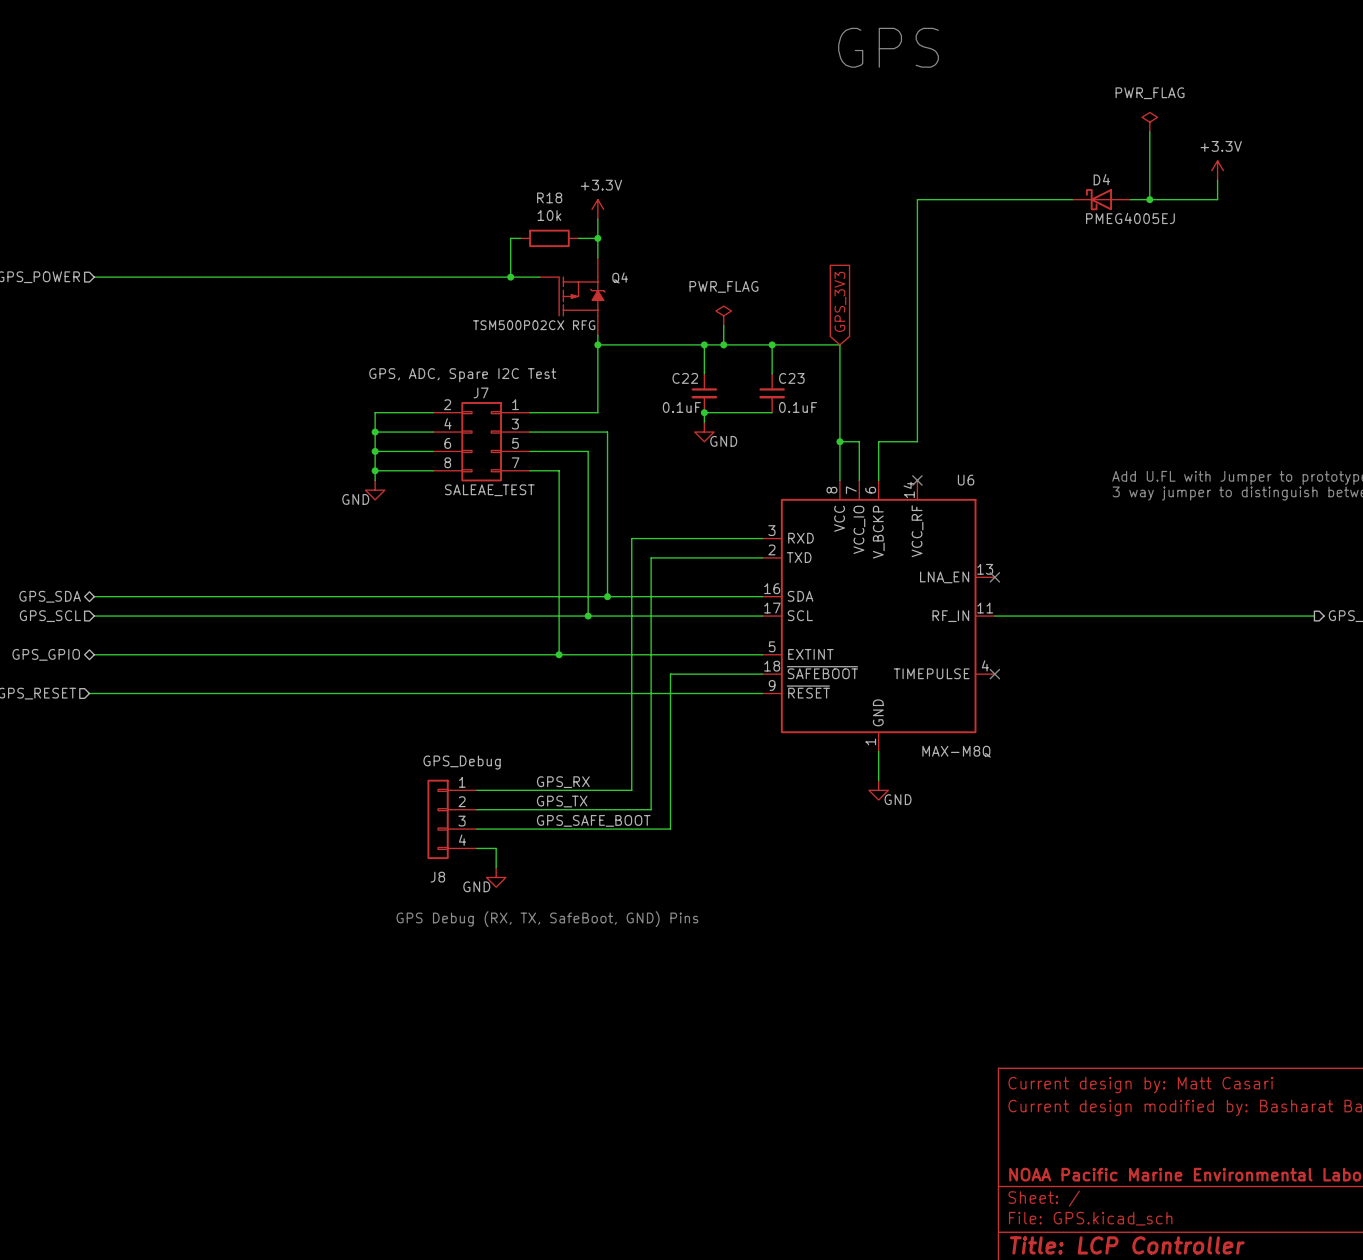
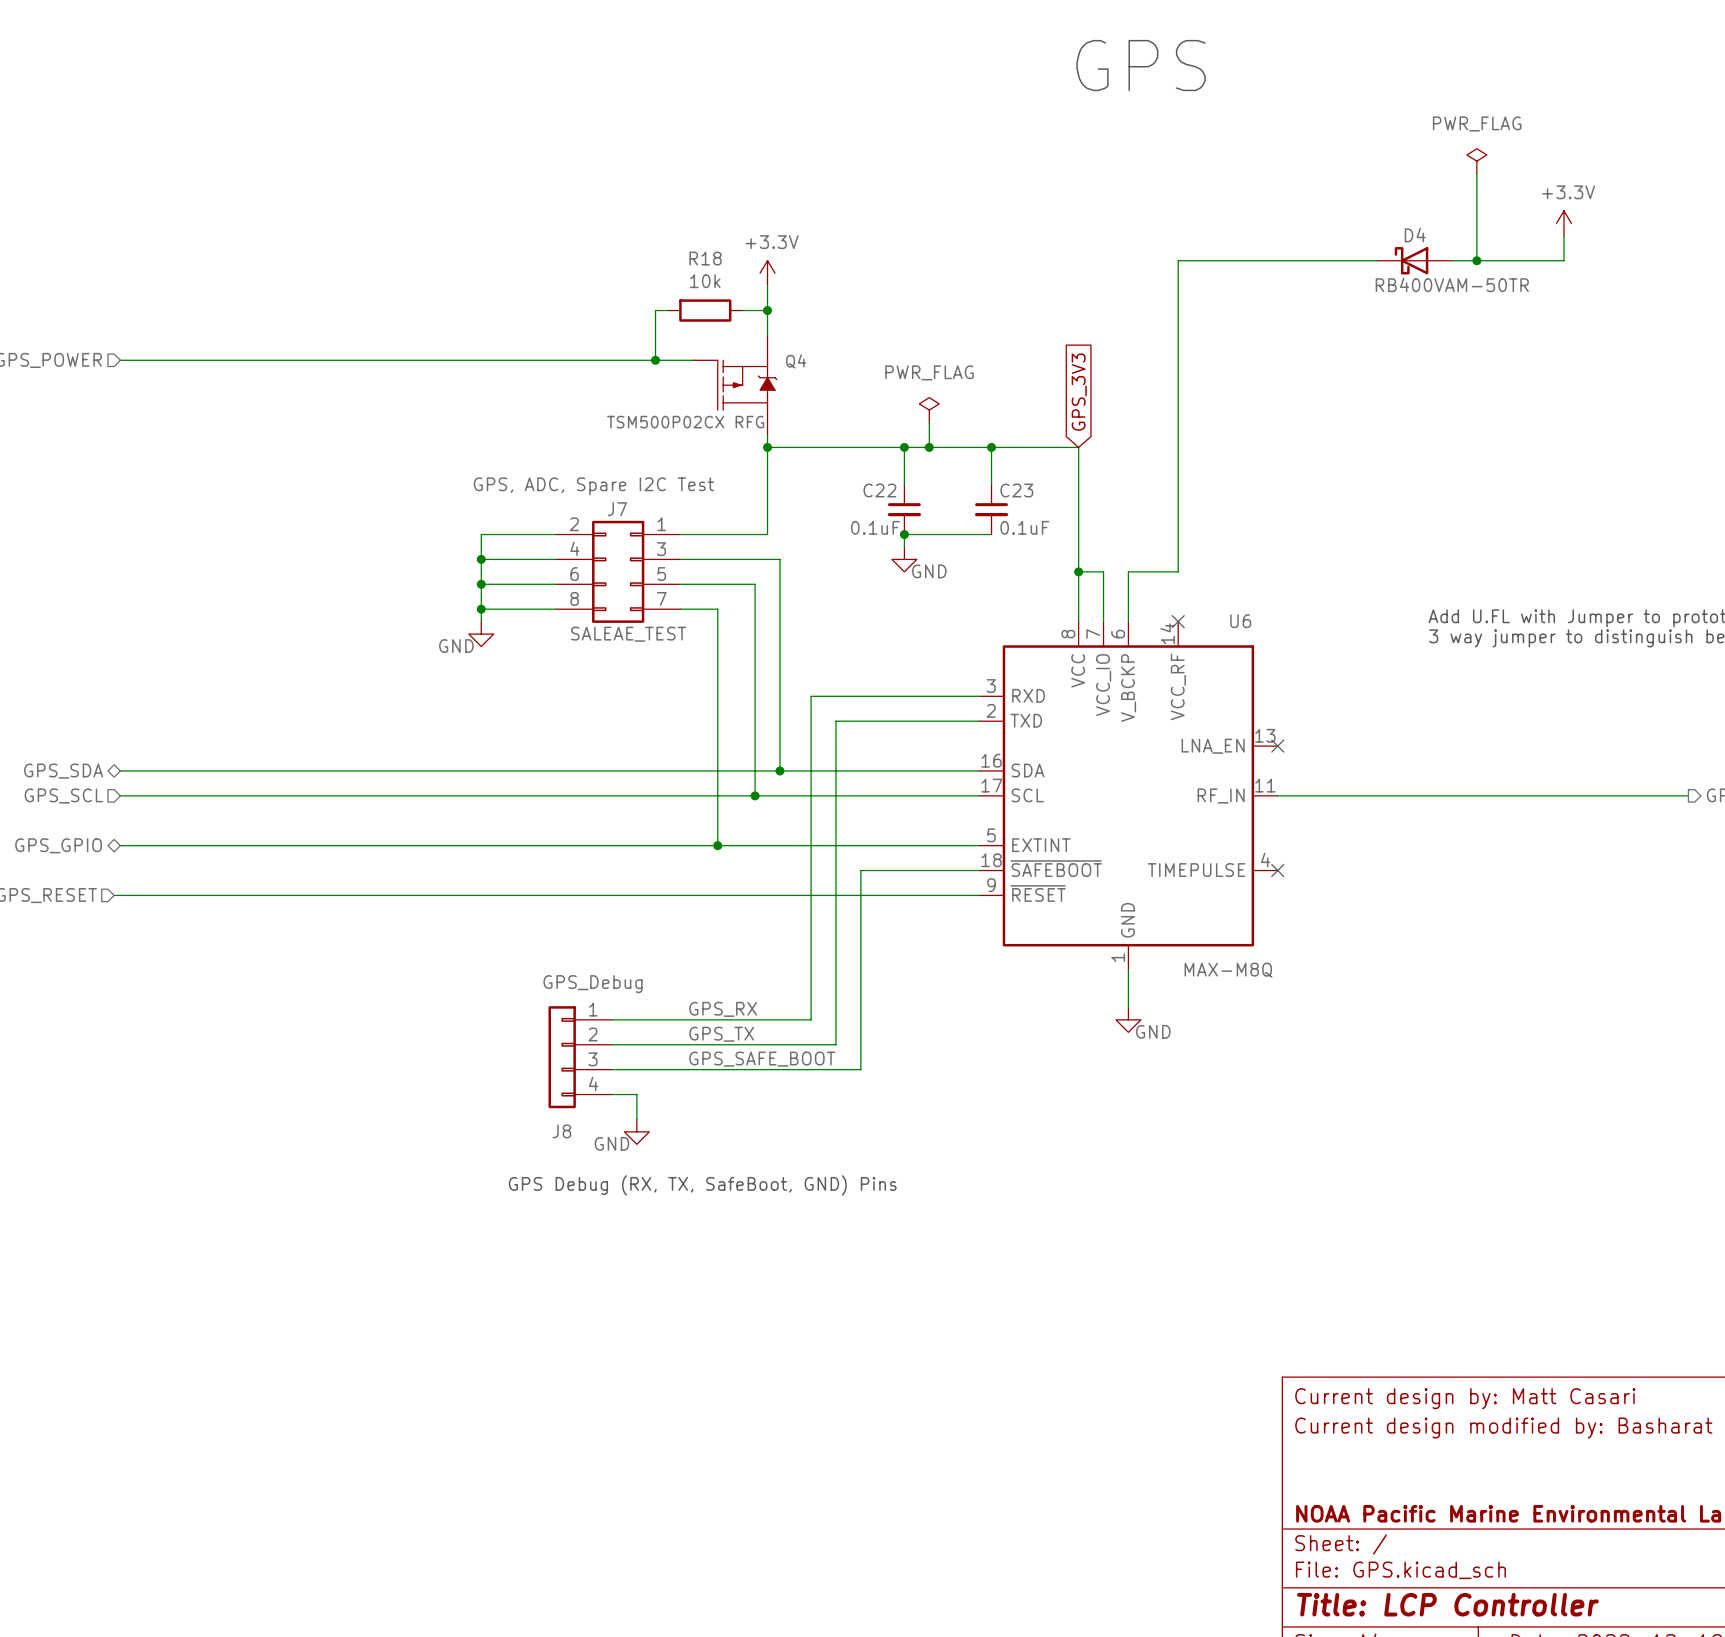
D4 value: PMEG4005EJ (1130, 218) -> RB400VAM-50TR (1452, 284)

